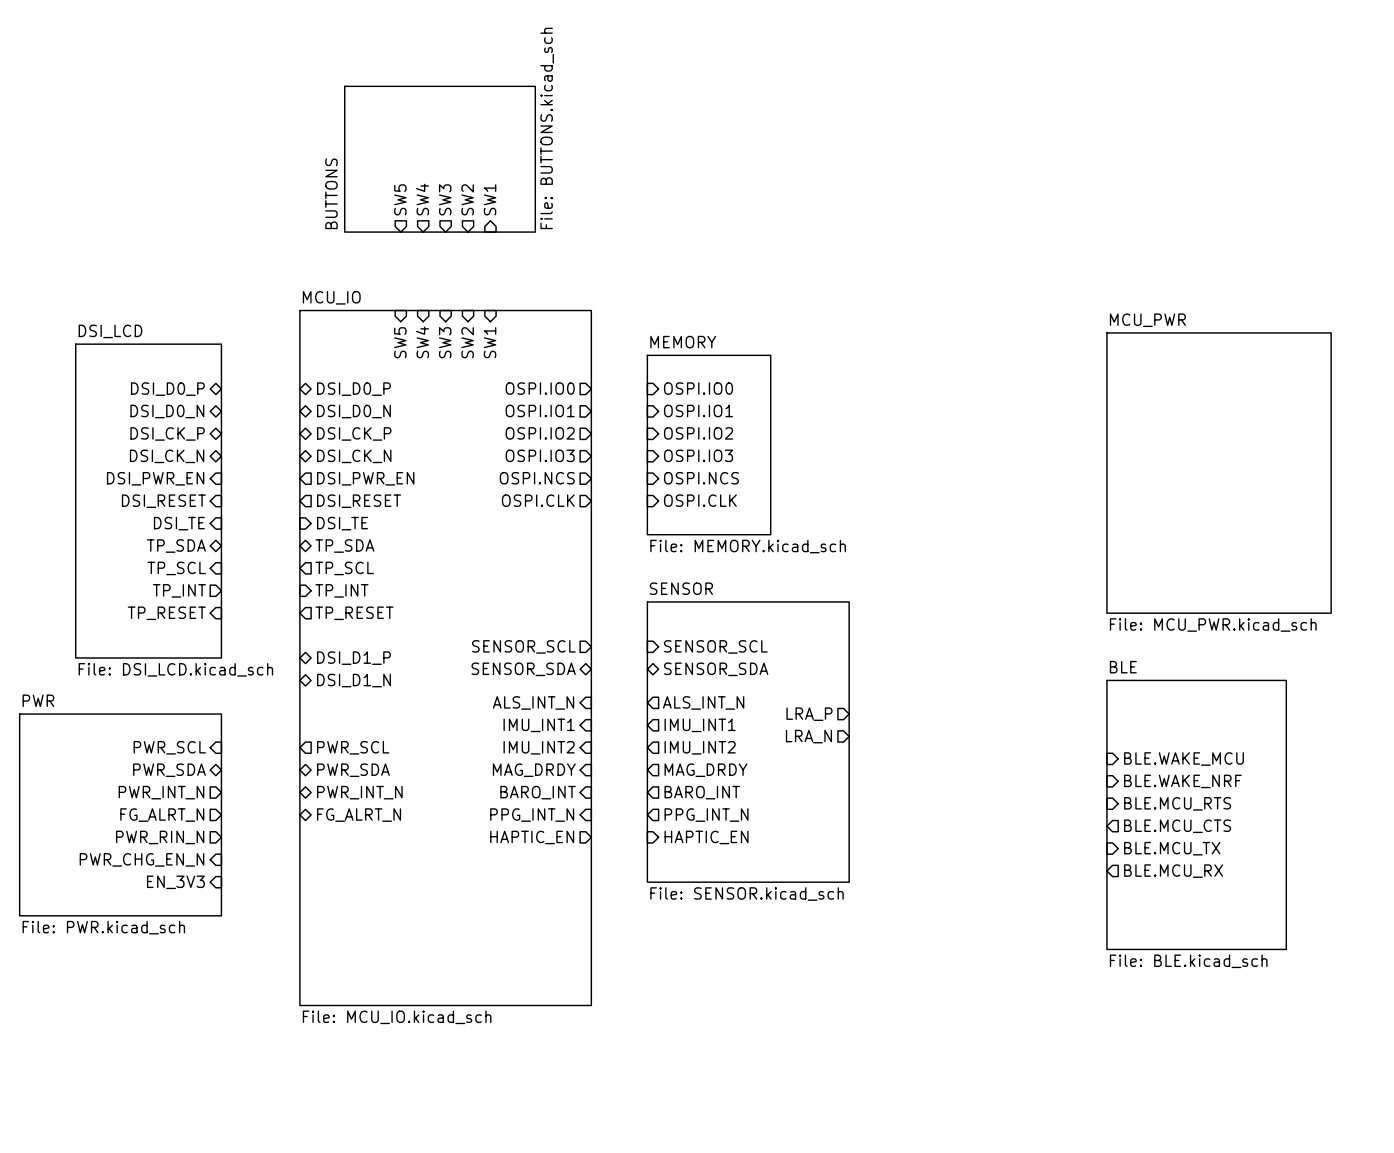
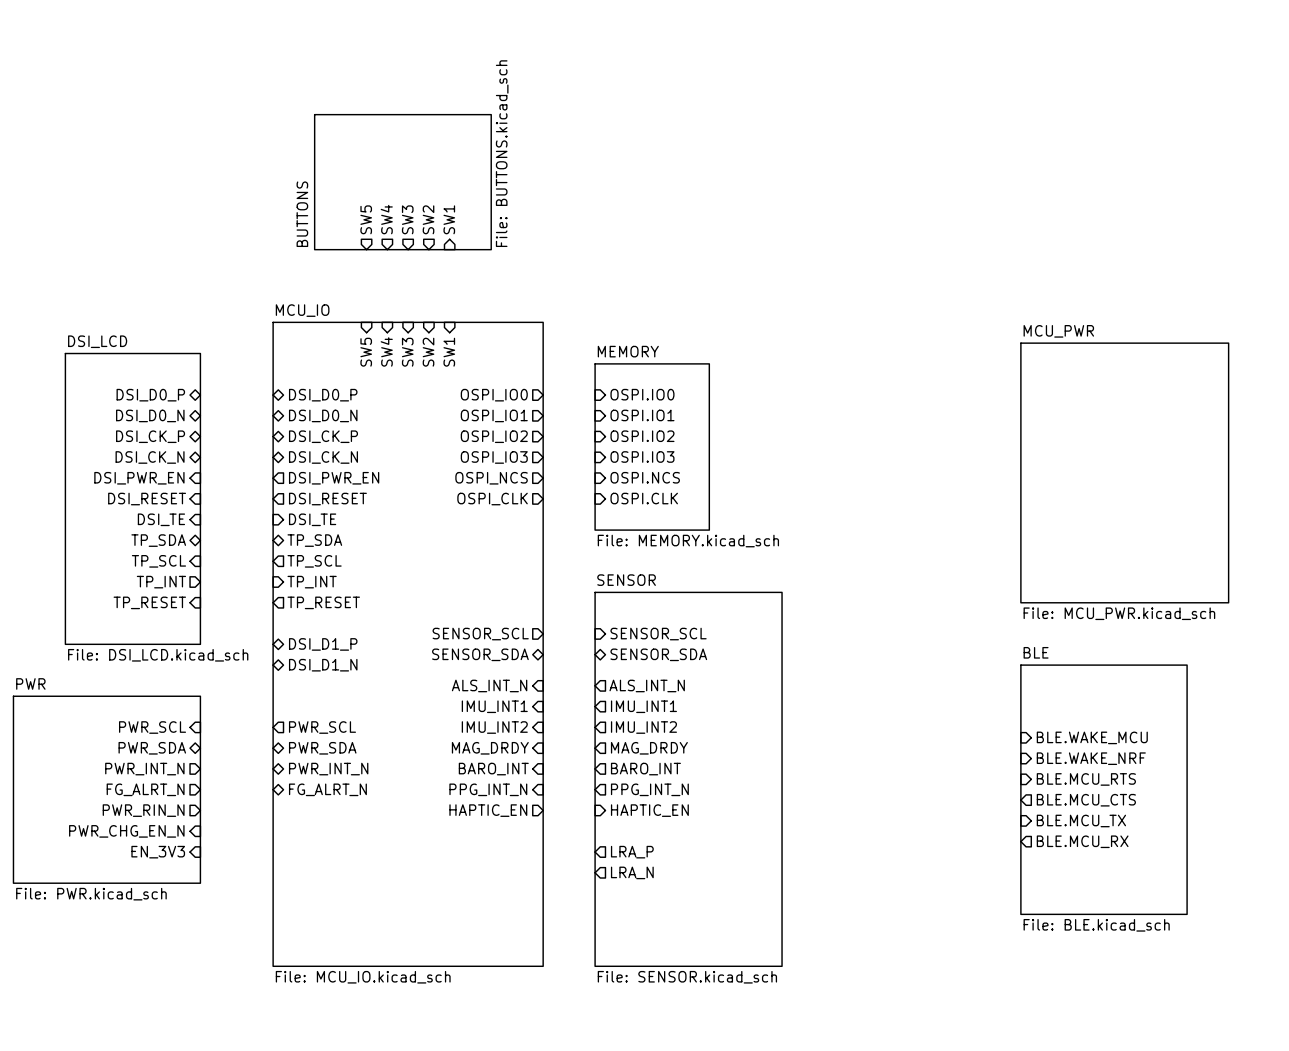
sheet pin: OSPI.IO0 (540, 388) -> OSPI_IO0 (494, 395)
sheet pin: OSPI.IO1 (540, 410) -> OSPI_IO1 (494, 415)
sheet pin: OSPI.IO2 (540, 433) -> OSPI_IO2 (494, 436)
sheet pin: OSPI.IO3 (540, 455) -> OSPI_IO3 (494, 457)
sheet pin: OSPI.NCS (537, 478) -> OSPI_NCS (491, 478)
sheet pin: OSPI.CLK (538, 500) -> OSPI_CLK (492, 499)
sheet pin: LRA_P (809, 714) -> none
sheet pin: LRA_N (808, 736) -> none
sheet SENSOR: File: SENSOR.kicad_sch (748, 742) -> none
sheet SENSOR: none -> File: SENSOR.kicad_sch (688, 779)
sheet pin: none -> LRA_P (632, 852)
sheet pin: none -> LRA_N (632, 872)

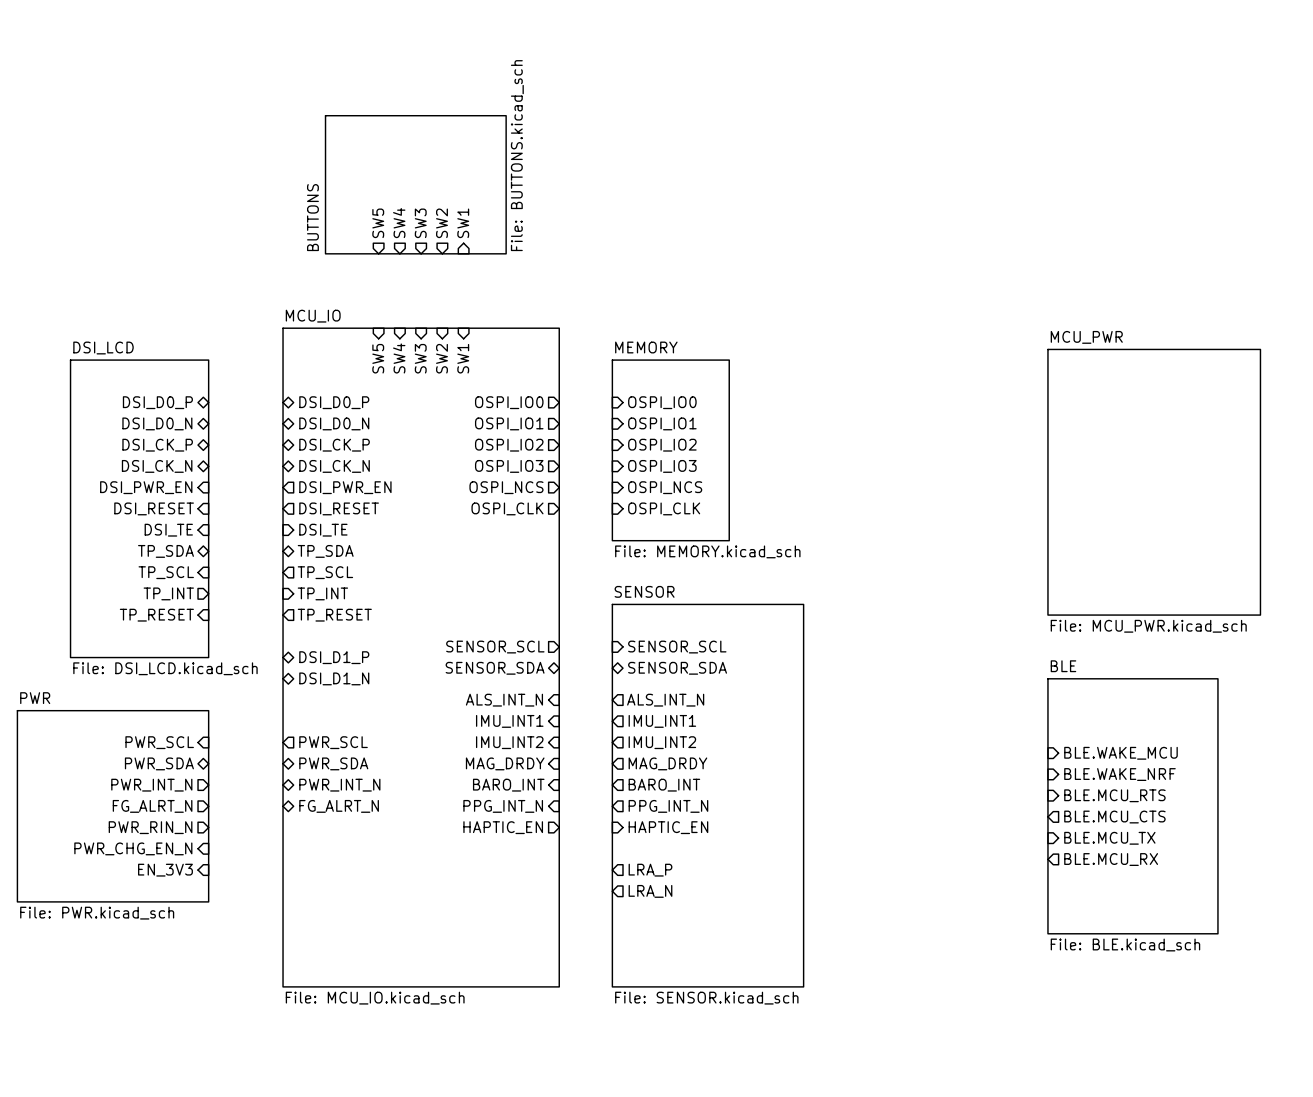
sheet MEMORY shape: [594, 363, 710, 531] -> [611, 359, 730, 542]
sheet pin: OSPI.IO0 (642, 394) -> OSPI_IO0 (662, 402)
sheet pin: OSPI.IO1 (642, 415) -> OSPI_IO1 (662, 423)
sheet pin: OSPI.IO2 (642, 436) -> OSPI_IO2 (662, 445)
sheet pin: OSPI.IO3 (642, 456) -> OSPI_IO3 (662, 466)
sheet pin: OSPI.NCS (645, 477) -> OSPI_NCS (665, 487)
sheet pin: OSPI.CLK (644, 498) -> OSPI_CLK (664, 508)

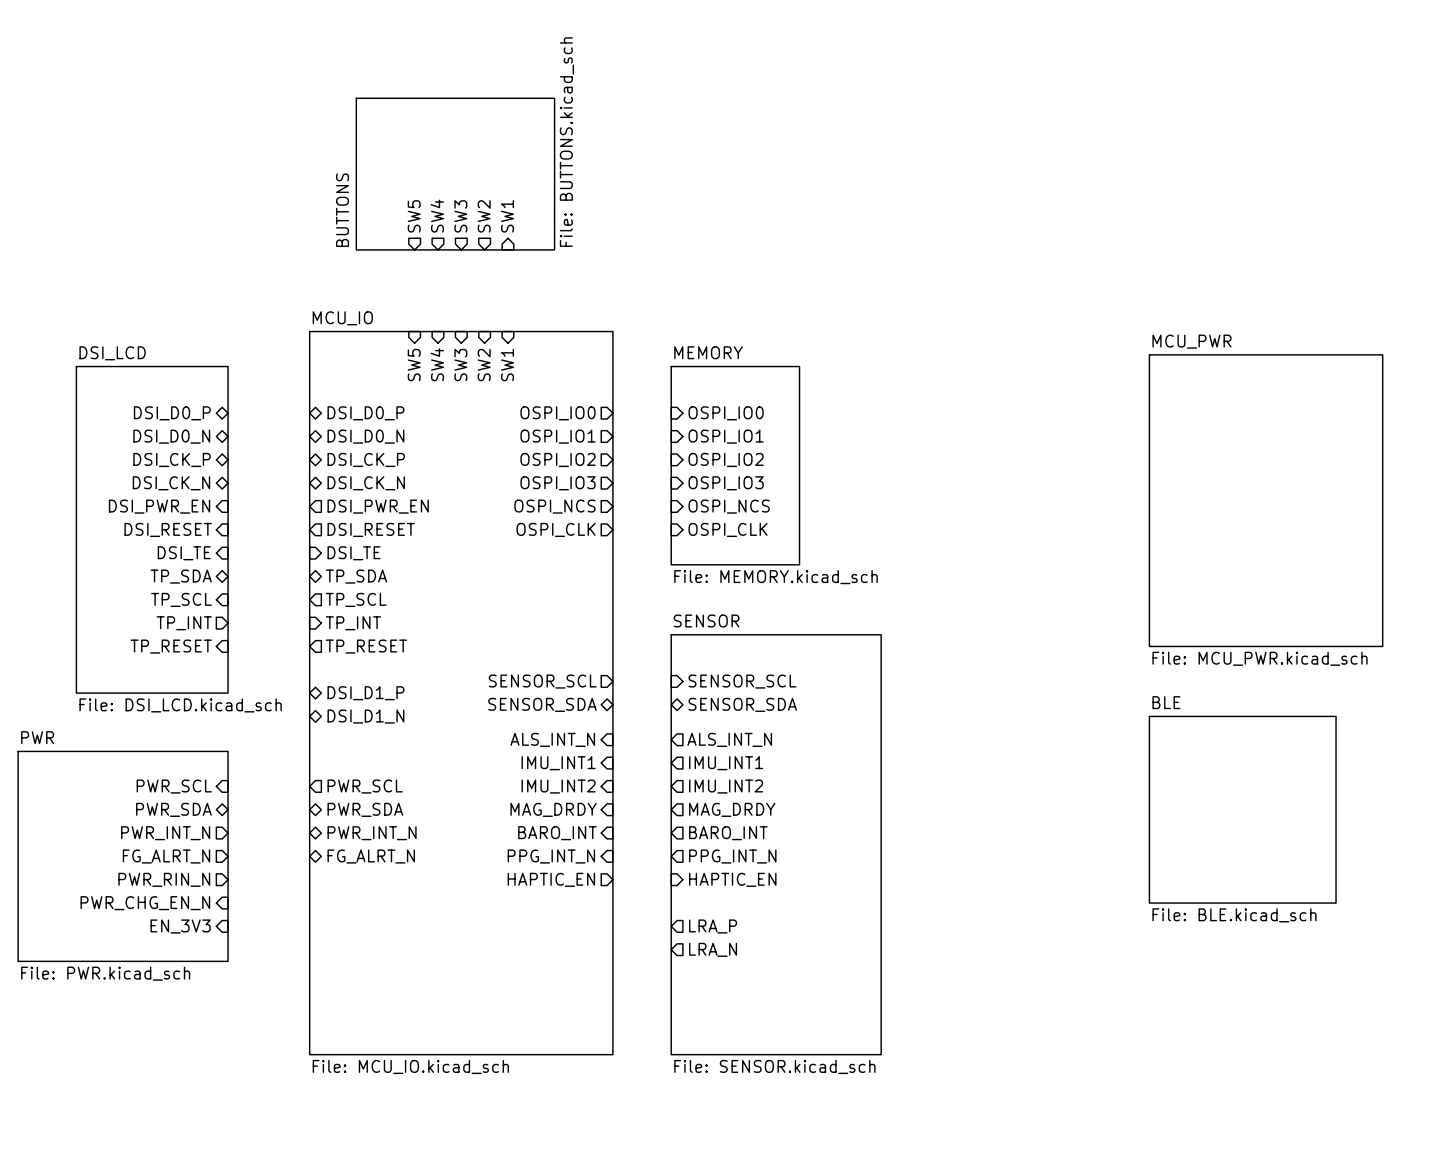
sheet pin: BLE.WAKE_MCU (1120, 753) -> none
sheet BLE: none -> File: BLE.kicad_sch (1242, 809)
sheet pin: BLE.WAKE_NRF (1119, 774) -> none
sheet pin: BLE.MCU_RTS (1114, 795) -> none
sheet BLE: File: BLE.kicad_sch (1132, 806) -> none
sheet pin: BLE.MCU_CTS (1114, 817) -> none
sheet pin: BLE.MCU_TX (1109, 838) -> none
sheet pin: BLE.MCU_RX (1111, 859) -> none

